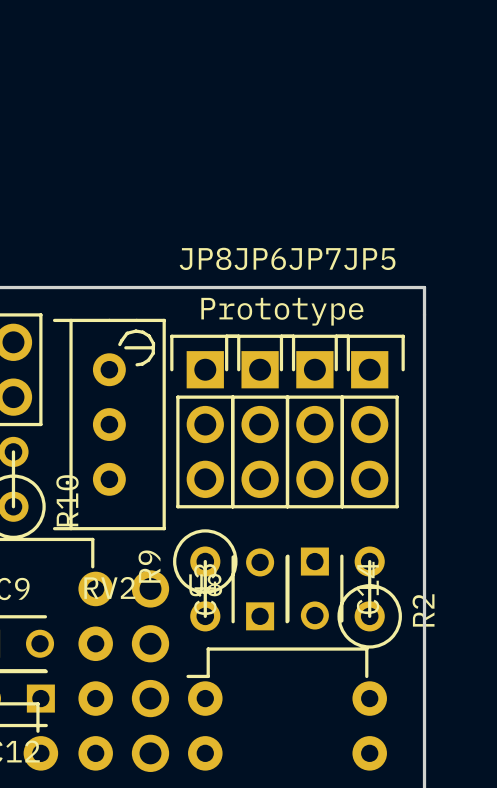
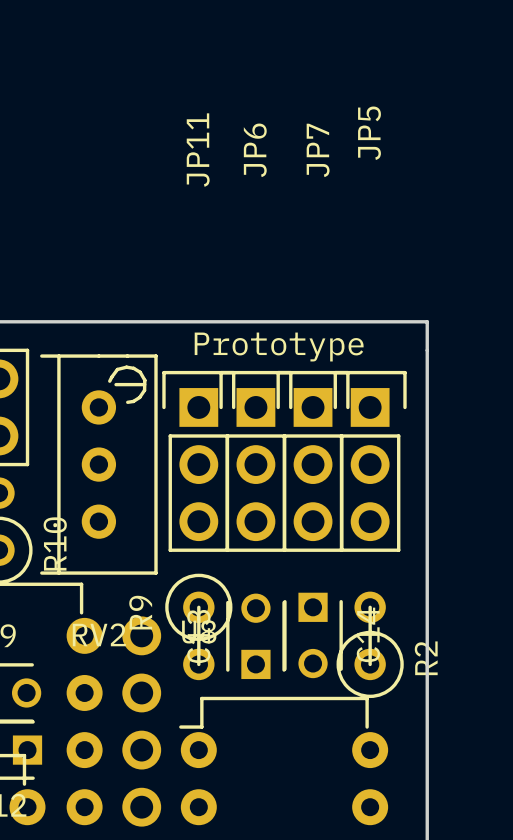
JP8 name: JP8 (205, 258) -> JP11 (198, 150)
JP6 name rotation: 0° (260, 259) -> 90° counterclockwise (255, 150)
JP6 name position: JP6 (260, 259) -> JP6 (255, 150)
JP7 name rotation: 0° (314, 259) -> 90° counterclockwise (318, 150)
JP7 name position: JP7 (314, 259) -> JP7 (318, 150)
JP5 name rotation: 0° (369, 259) -> 90° counterclockwise (369, 133)
JP5 name position: JP5 (369, 259) -> JP5 (369, 133)

